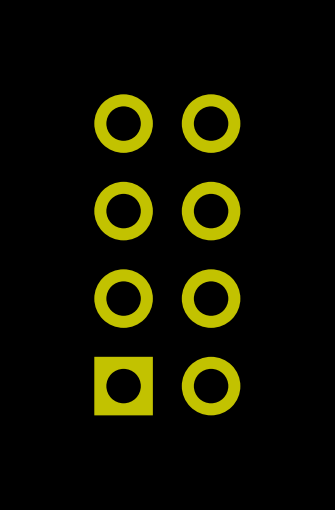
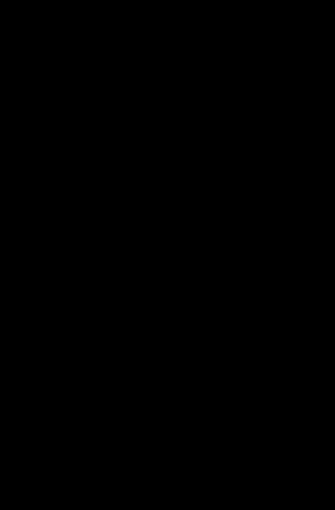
part: (167, 254) -> none

